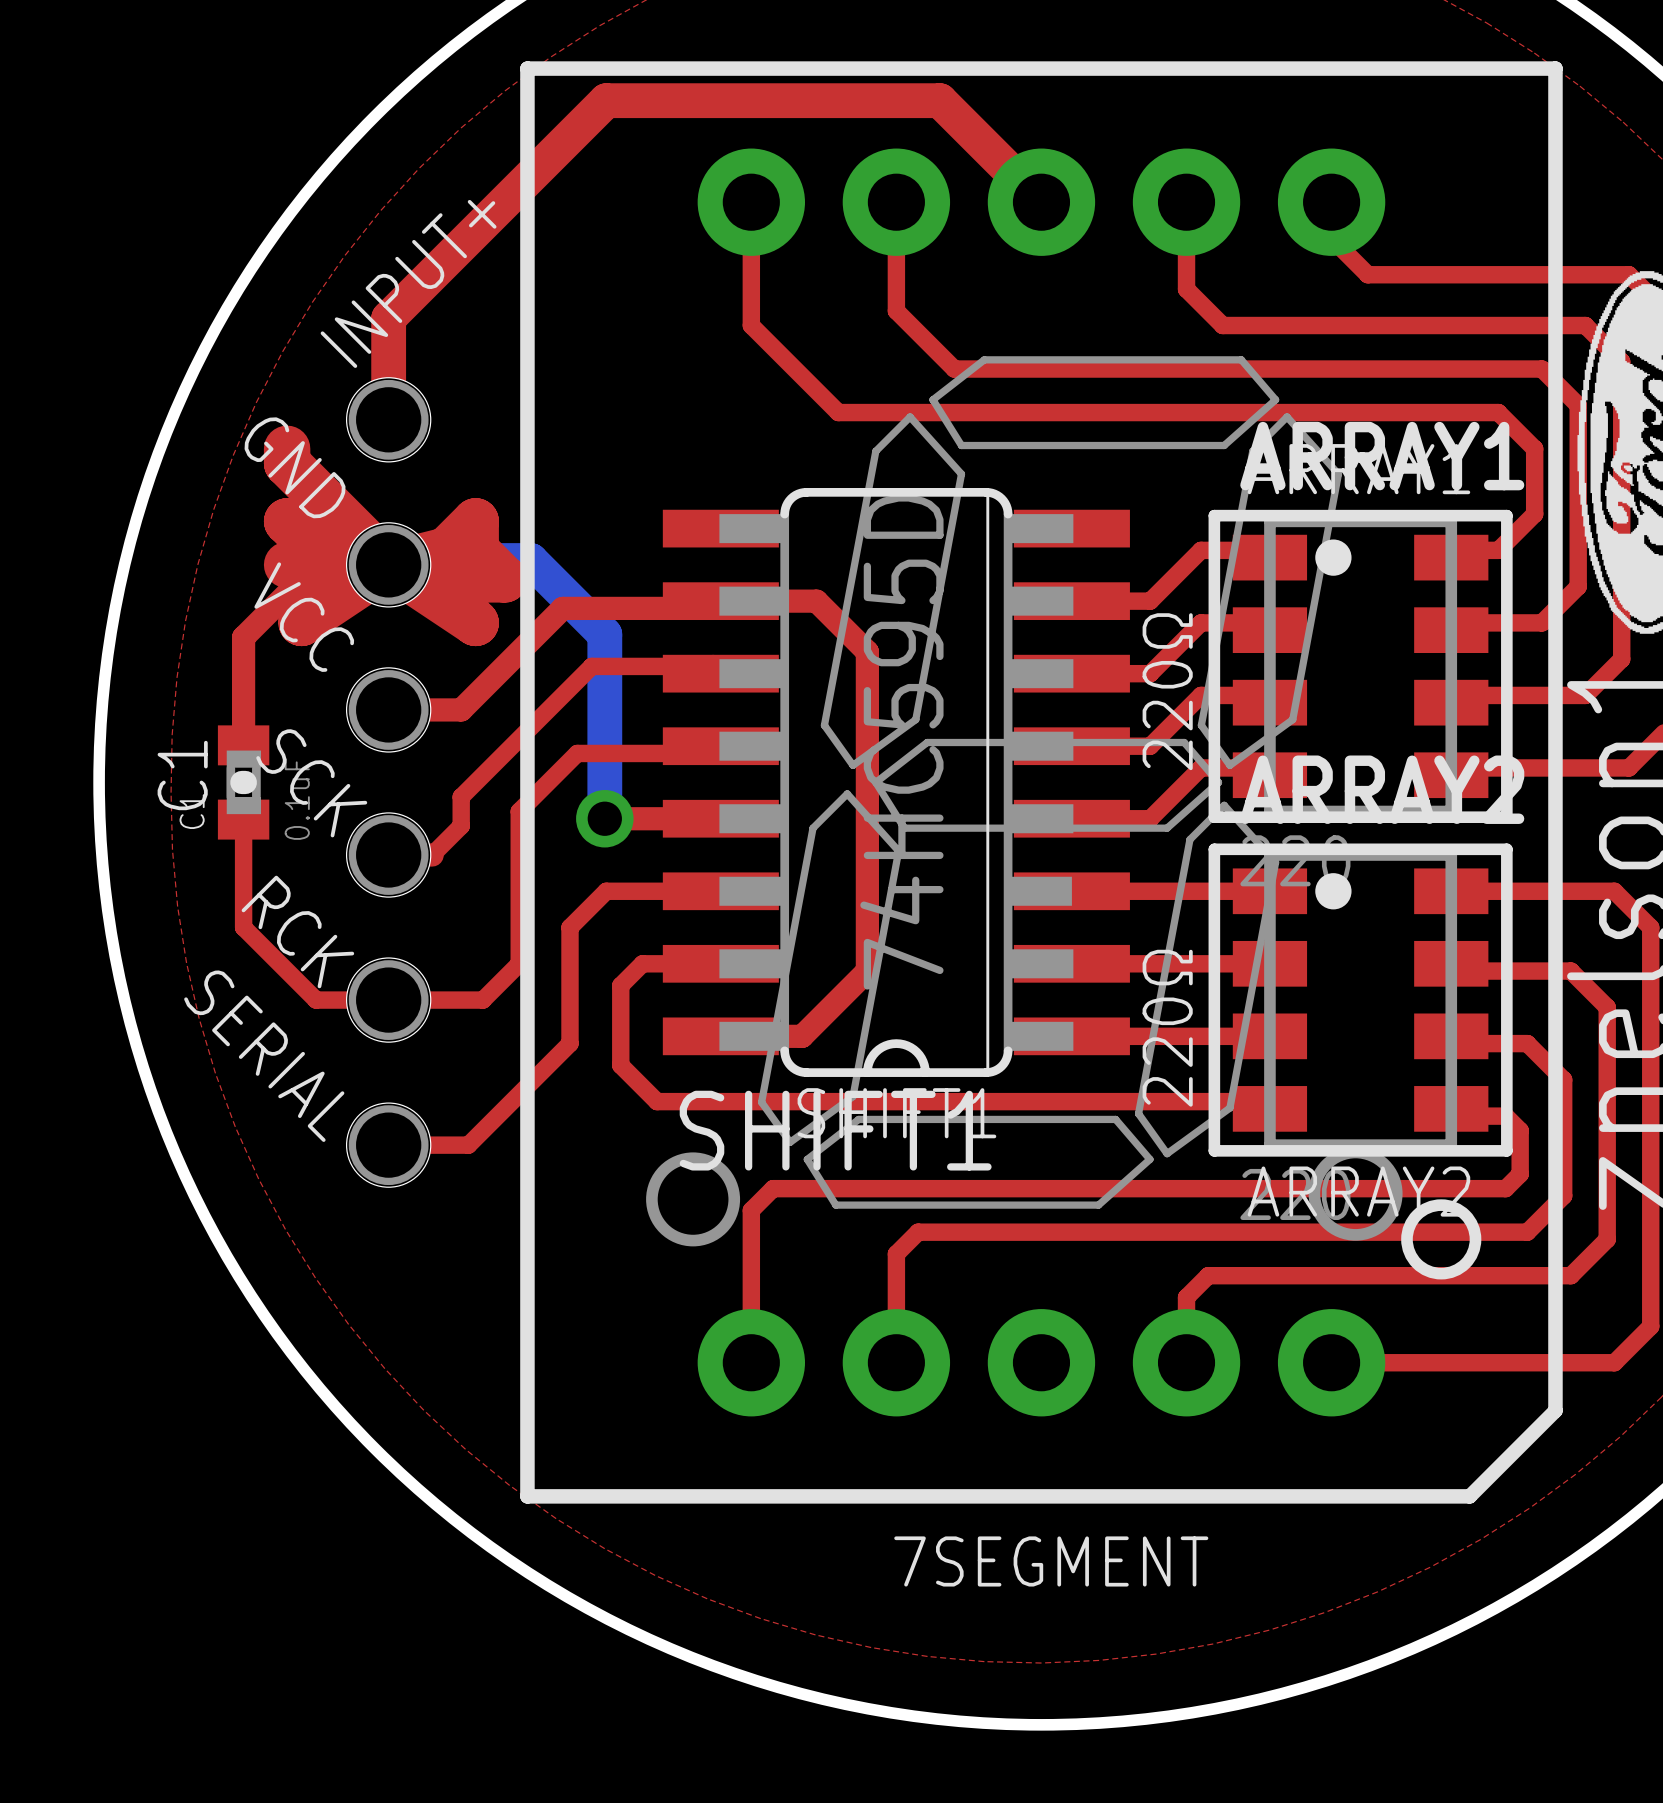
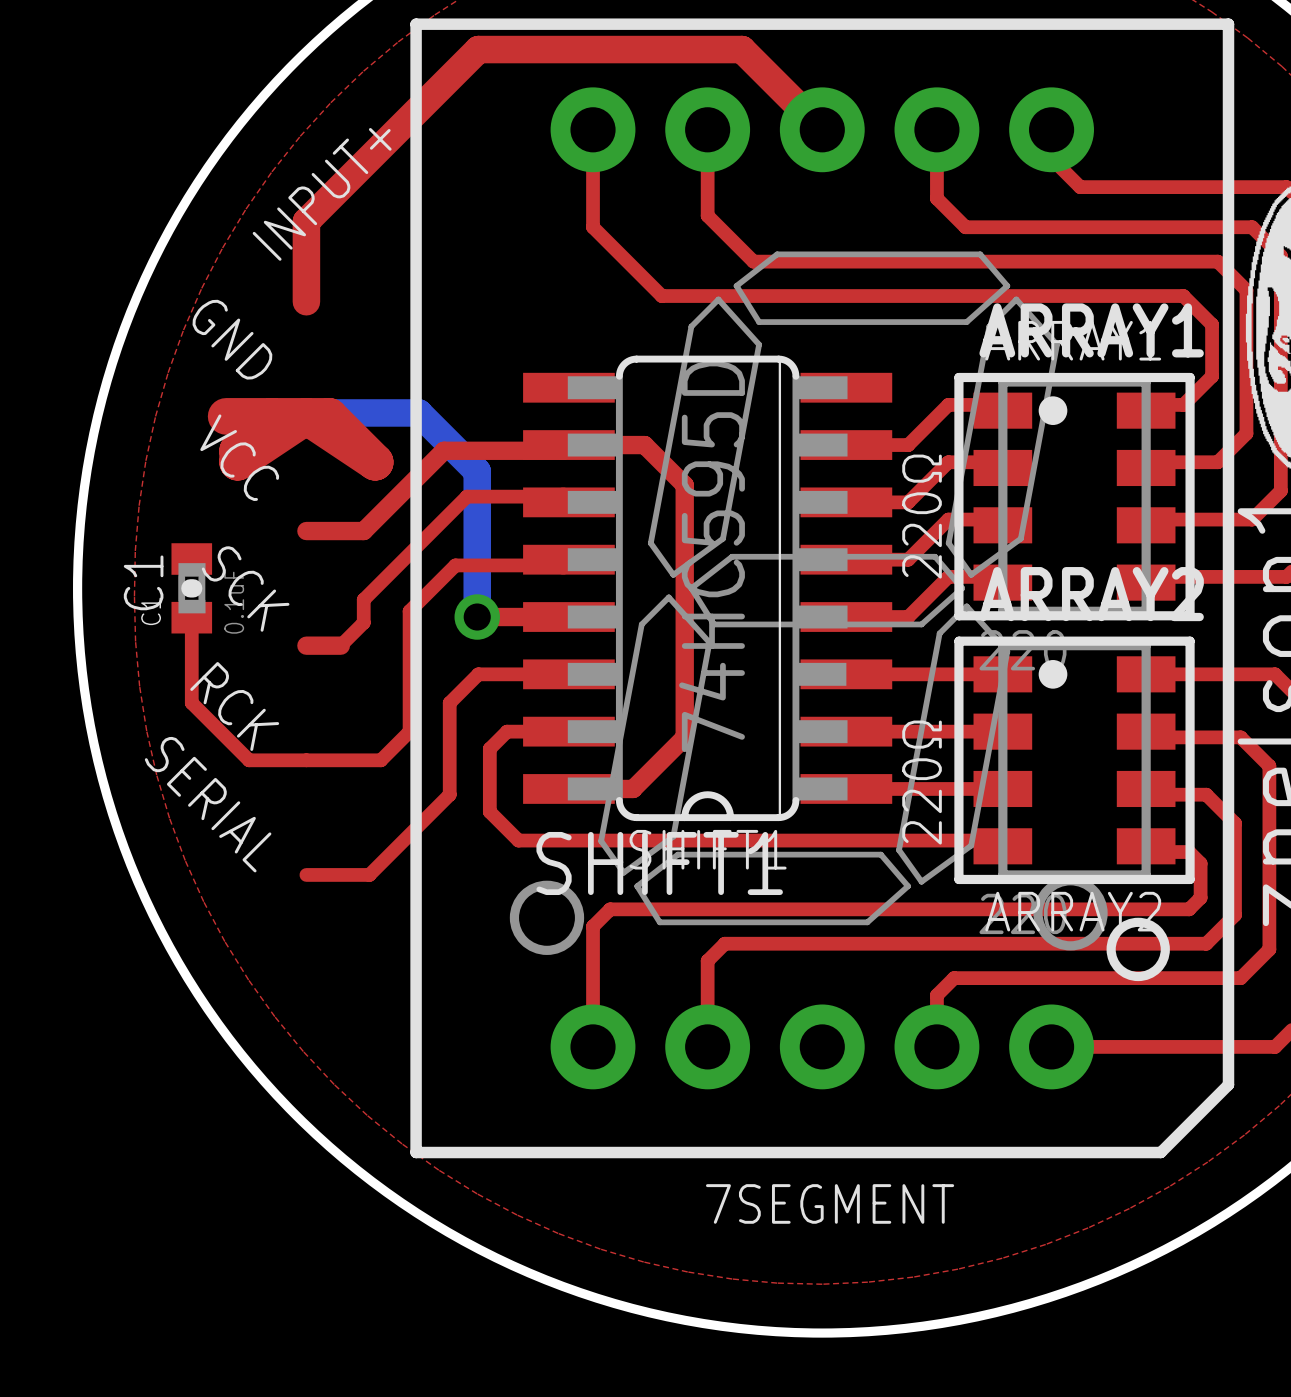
top track: (287, 448) (287, 463) (388, 564) -> none
top track: (388, 564) (316, 564) (243, 637) (243, 745) -> none
top track: (388, 564) (287, 521) (345, 579) (504, 579) (475, 550) (475, 521) (446, 550) (388, 564) -> none
part: (388, 782) -> none

